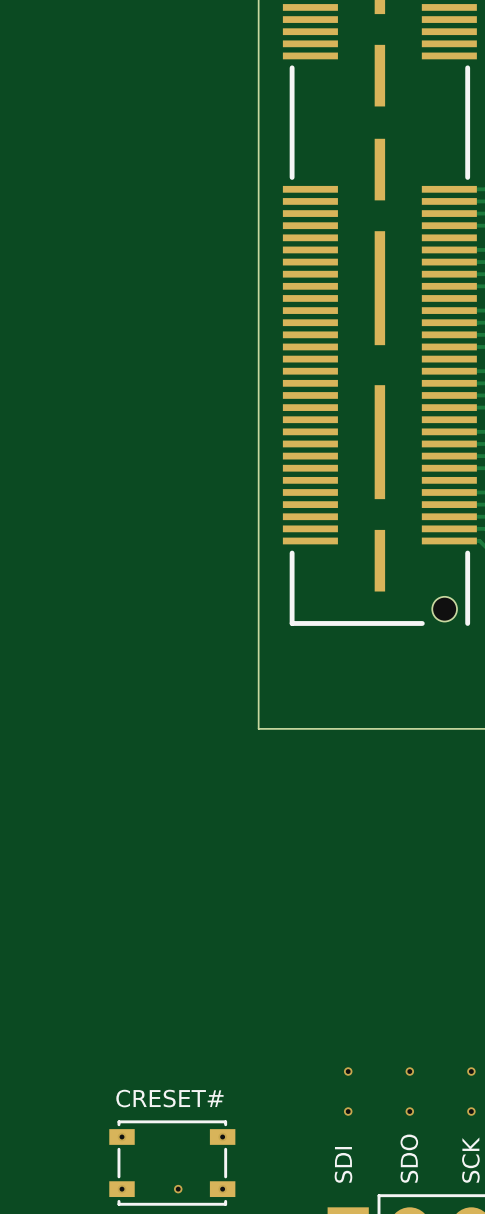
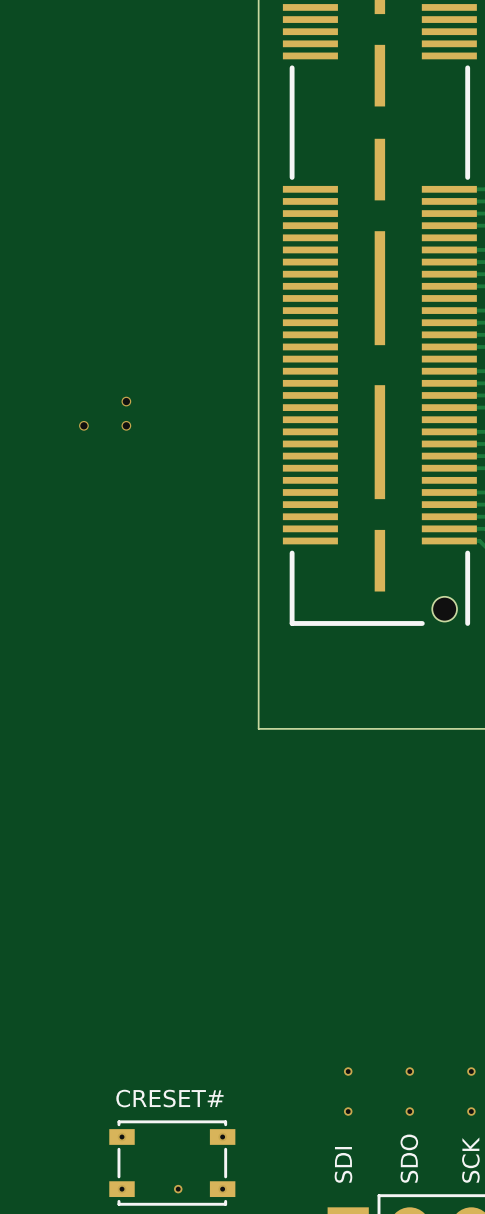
via: none -> (126, 401)
via: none -> (83, 425)
via: none -> (126, 425)

